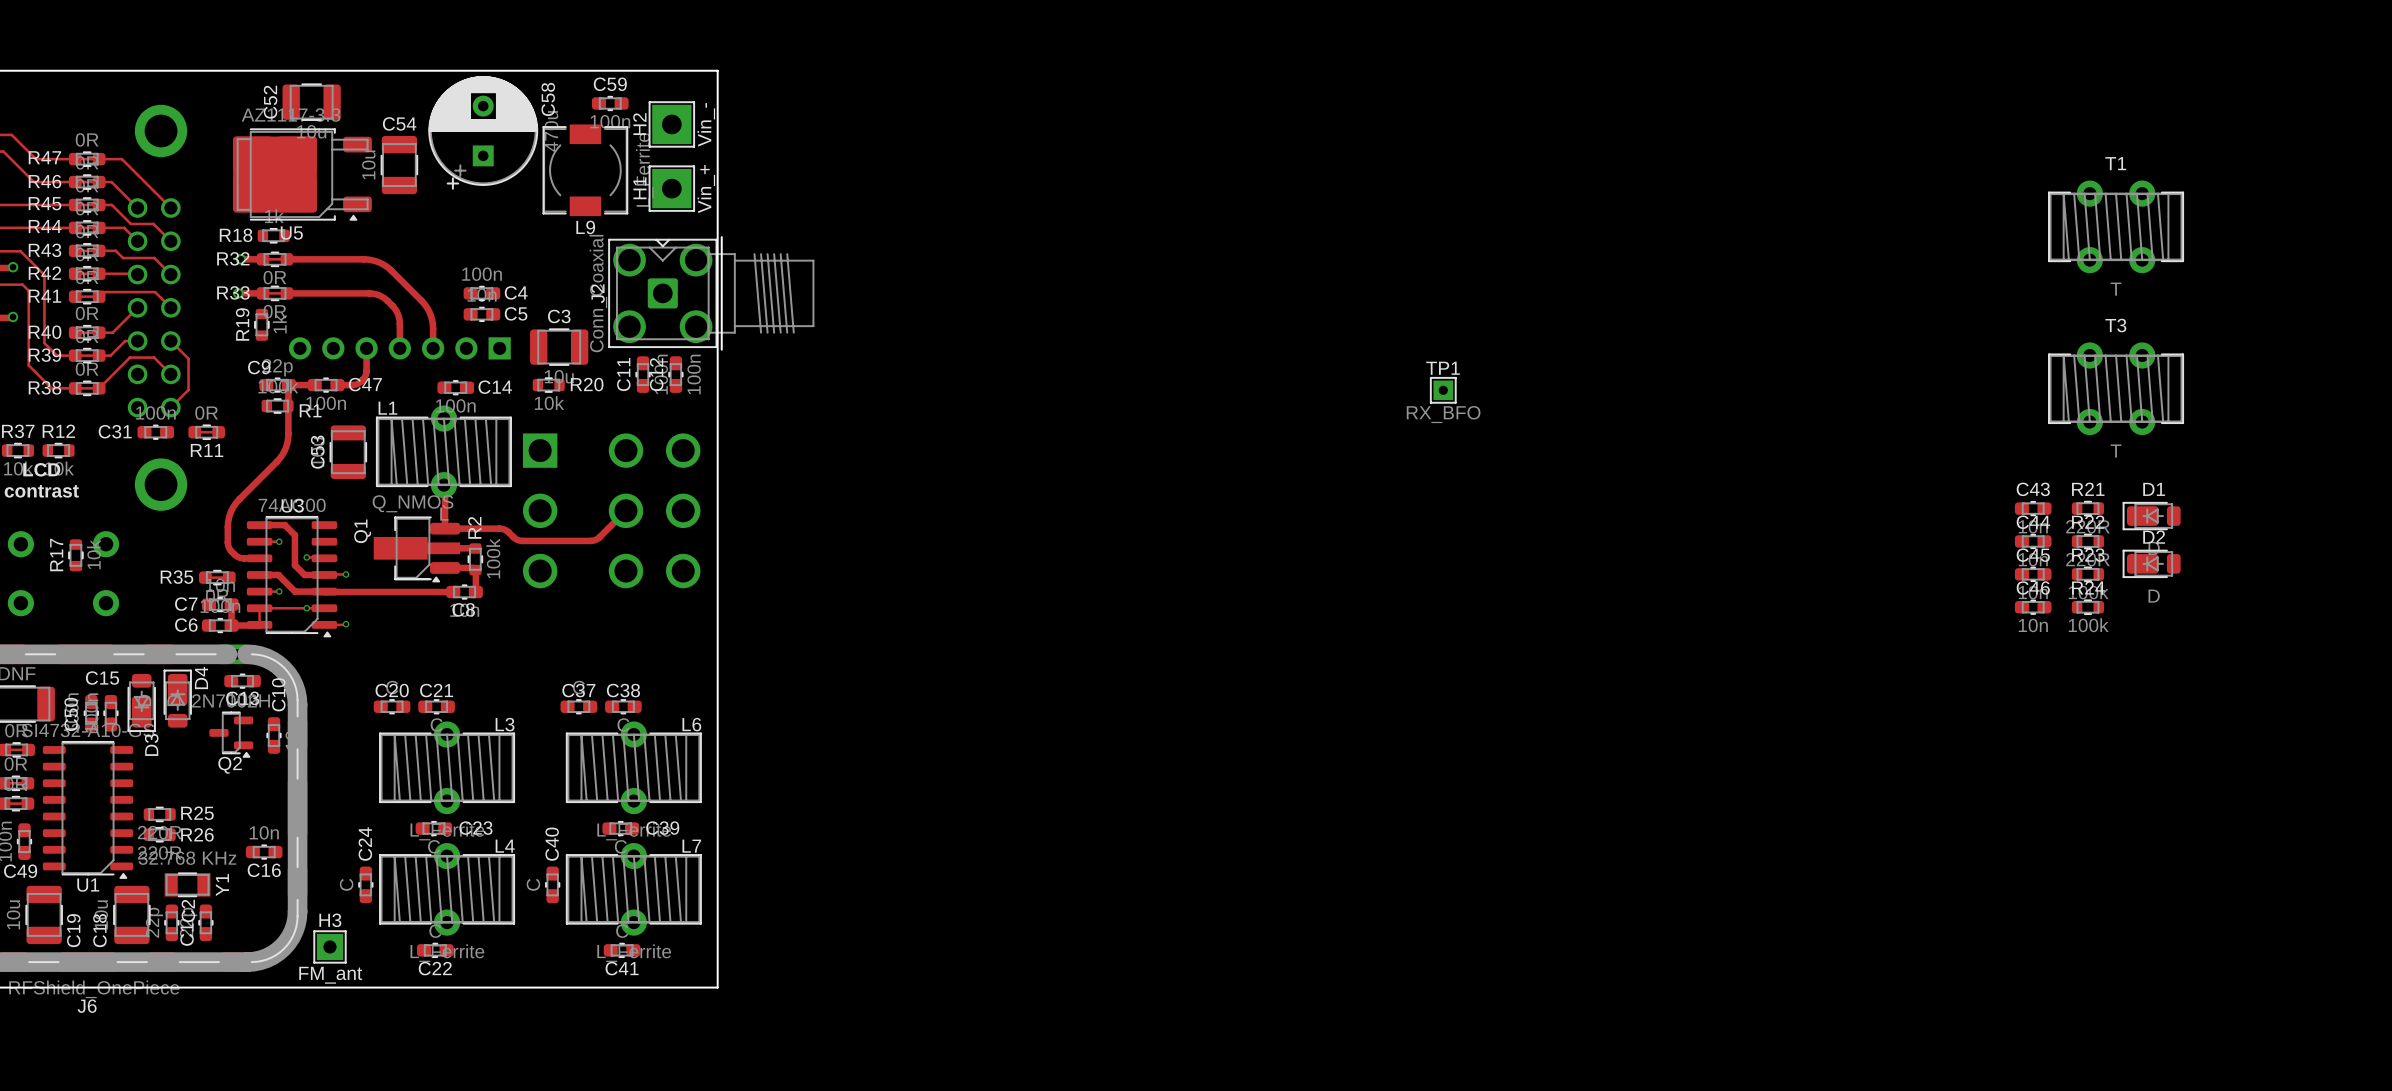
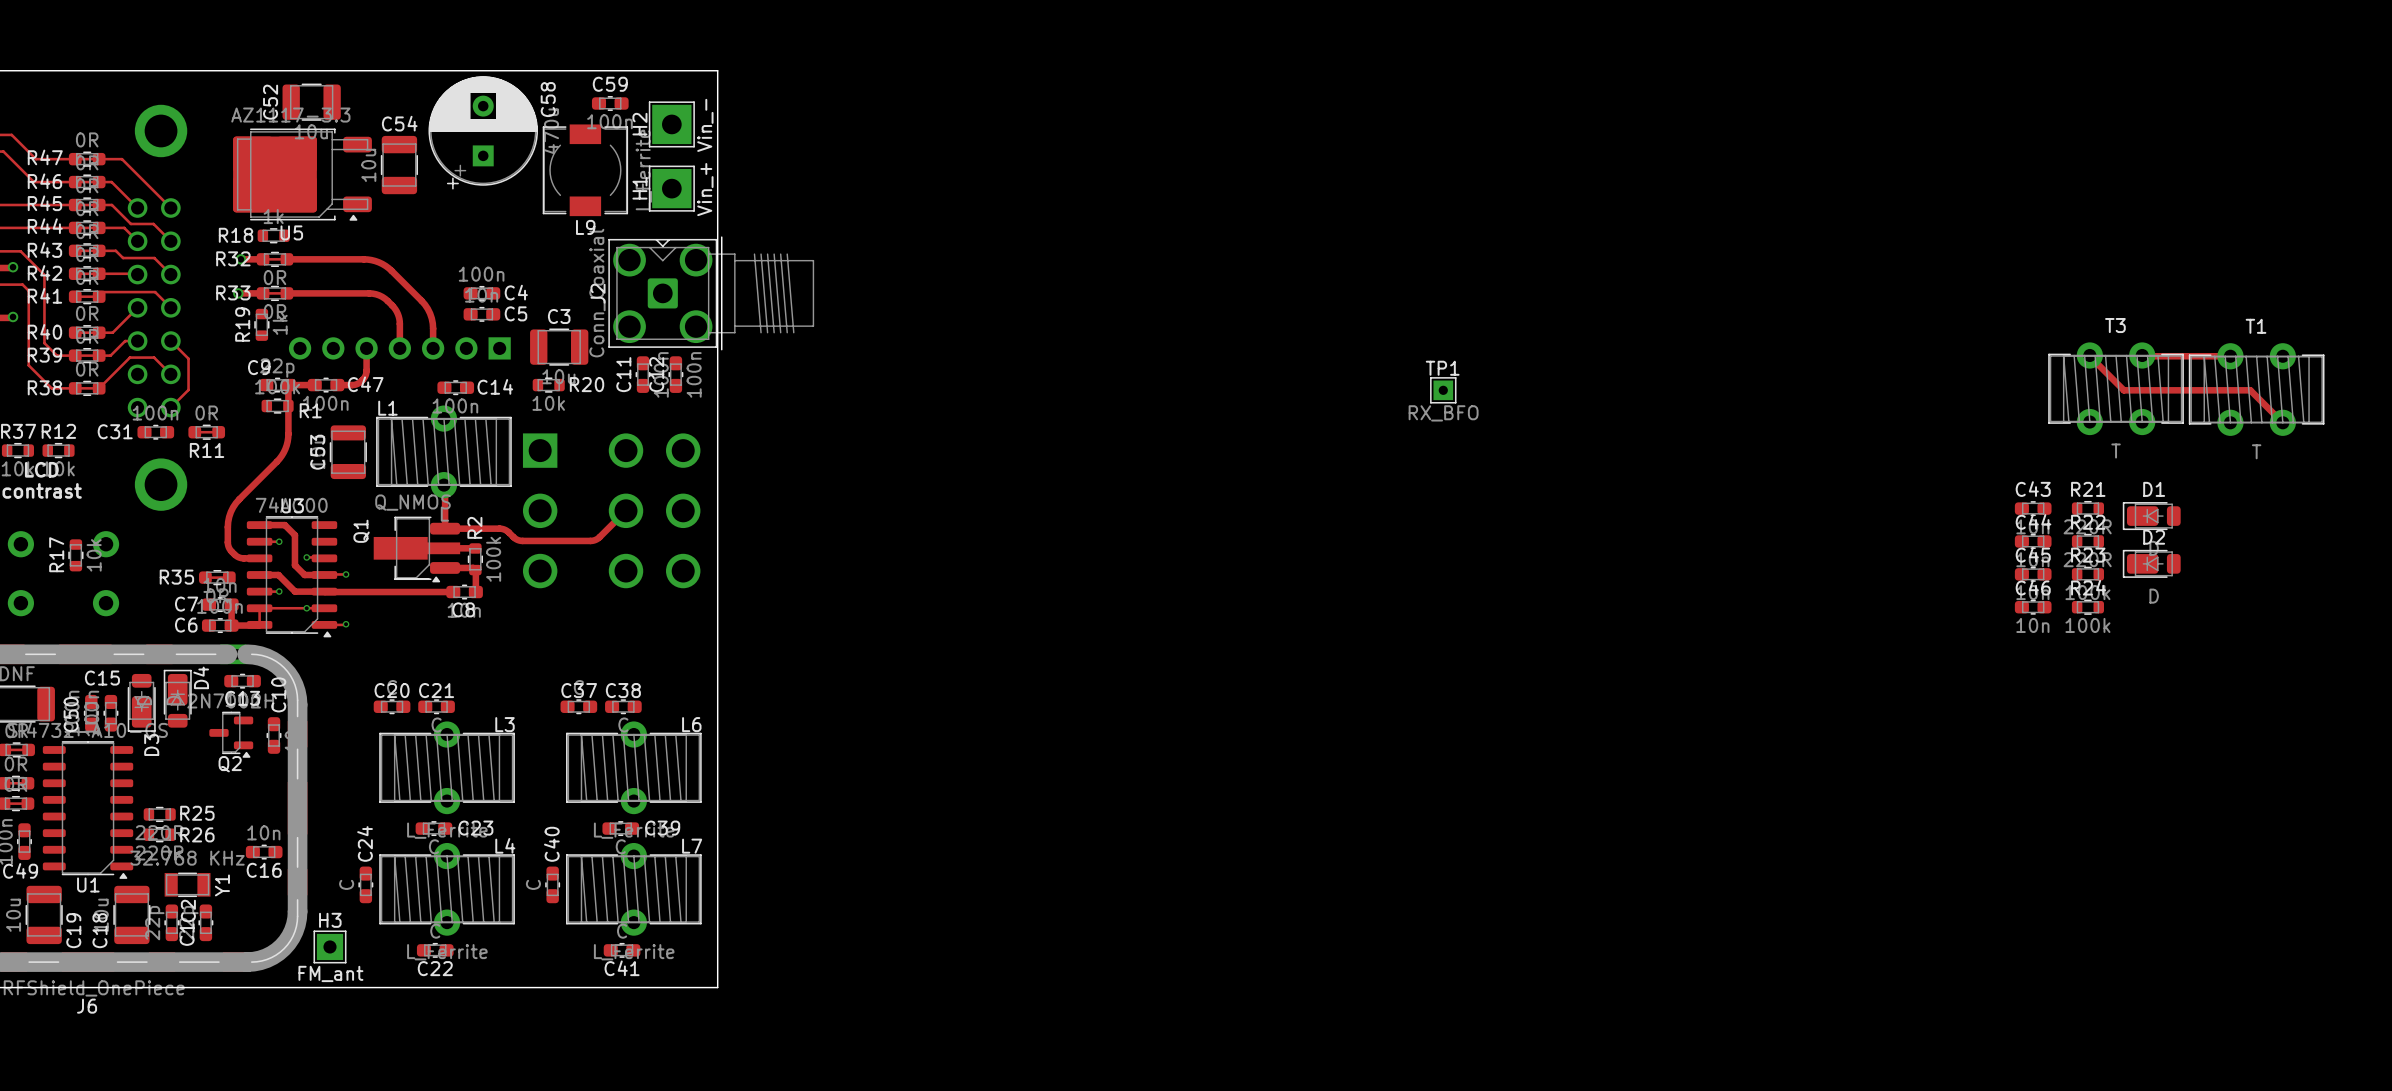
T1 position: (2116, 226) -> (2256, 389)
track: none -> (2089, 356) (2123, 390) (2250, 390) (2282, 422)
track: none -> (2142, 356) (2230, 356)

